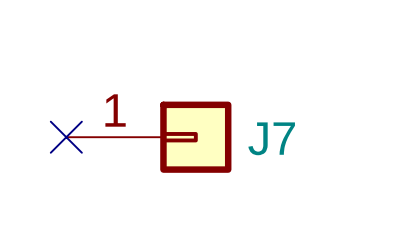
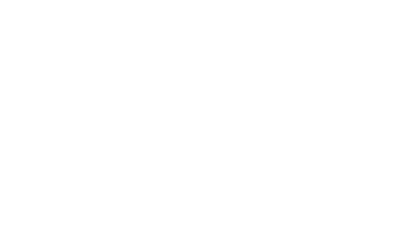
no-connect mark: (66, 137) -> none
J7: (148, 137) -> none

